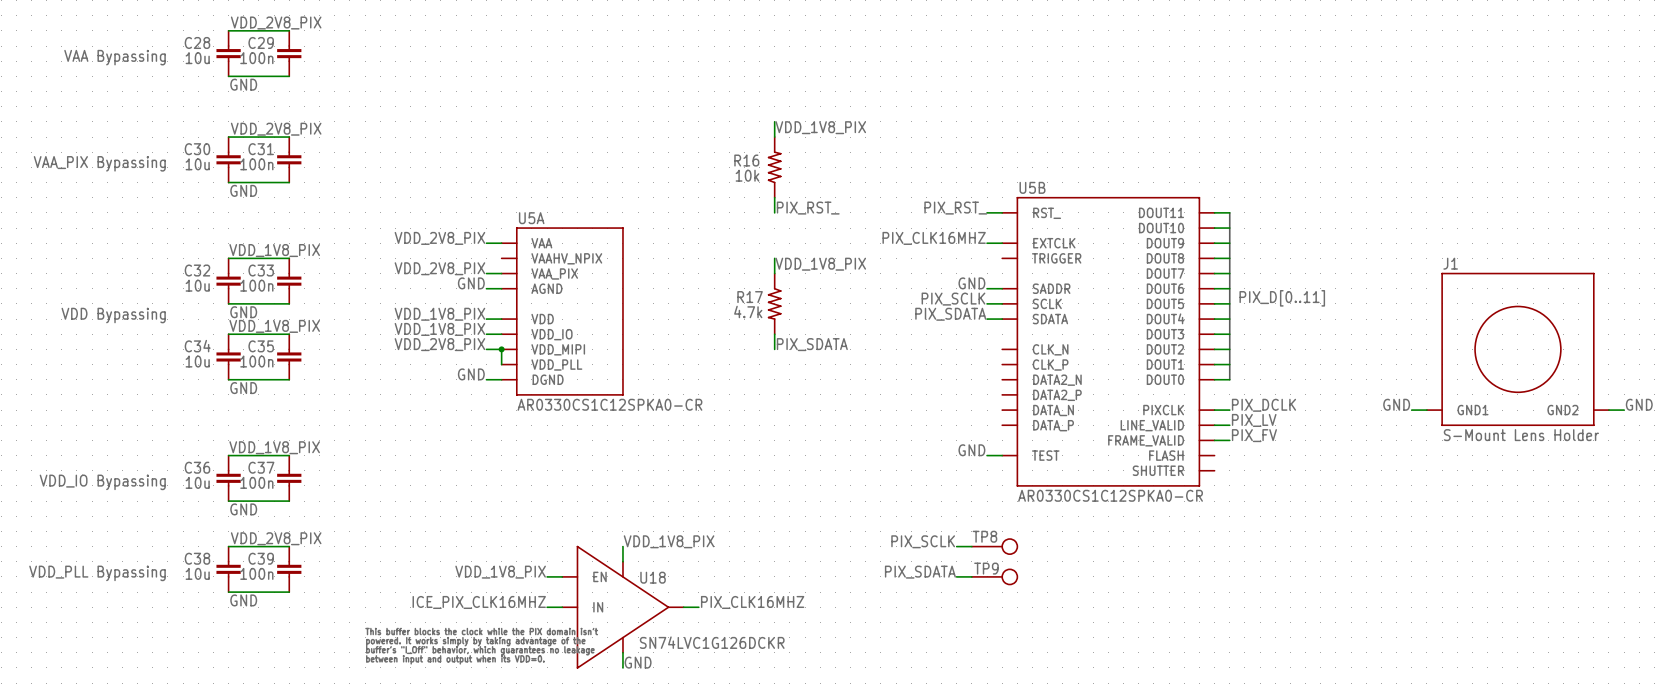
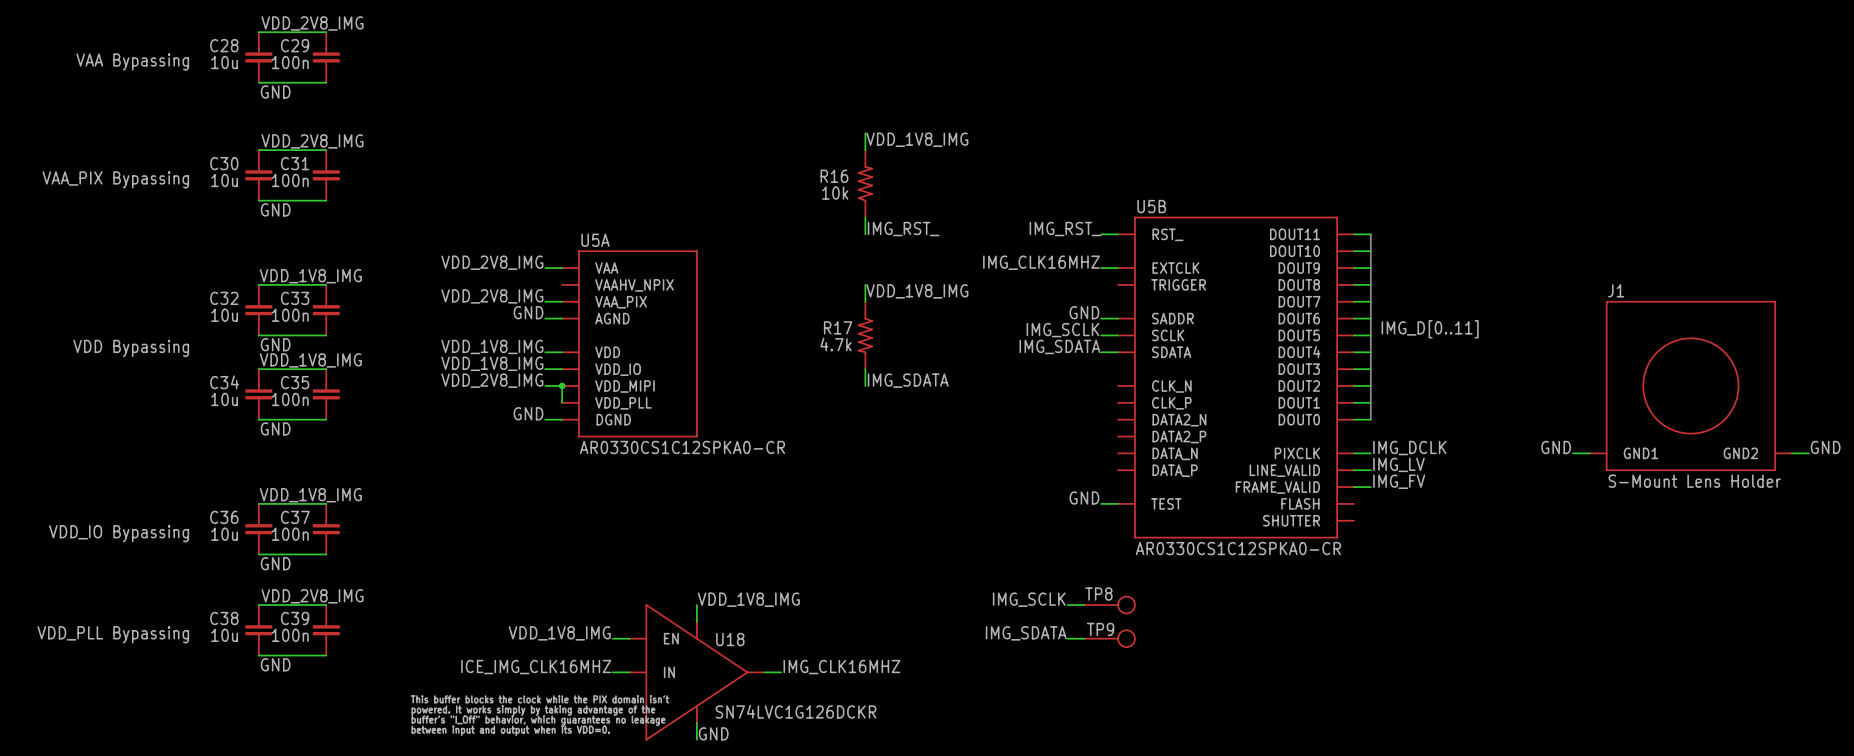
label: VDD_2V8_PIX (276, 23) -> VDD_2V8_IMG (312, 23)
label: VDD_1V8_PIX (820, 127) -> VDD_1V8_IMG (917, 139)
label: VDD_2V8_PIX (276, 129) -> VDD_2V8_IMG (312, 141)
label: PIX_RST_ (808, 208) -> IMG_RST_ (903, 229)
label: PIX_RST_ (955, 208) -> IMG_RST_ (1065, 229)
label: VDD_2V8_PIX (439, 238) -> VDD_2V8_IMG (492, 262)
label: PIX_CLK16MHZ (934, 238) -> IMG_CLK16MHZ (1041, 262)
label: VDD_1V8_PIX (274, 250) -> VDD_1V8_IMG (310, 276)
label: VDD_1V8_PIX (820, 264) -> VDD_1V8_IMG (917, 291)
label: VDD_2V8_PIX (439, 268) -> VDD_2V8_IMG (492, 296)
label: PIX_D[0..11] (1282, 298) -> IMG_D[0..11] (1430, 329)
label: PIX_SCLK (953, 299) -> IMG_SCLK (1062, 330)
label: VDD_1V8_PIX (439, 314) -> VDD_1V8_IMG (492, 346)
label: PIX_SDATA (950, 314) -> IMG_SDATA (1059, 346)
label: VDD_1V8_PIX (274, 326) -> VDD_1V8_IMG (310, 360)
label: VDD_1V8_PIX (439, 329) -> VDD_1V8_IMG (492, 363)
label: VDD_2V8_PIX (439, 344) -> VDD_2V8_IMG (492, 380)
label: PIX_SDATA (812, 344) -> IMG_SDATA (908, 380)
label: PIX_DCLK (1263, 405) -> IMG_DCLK (1409, 448)
label: PIX_LV (1254, 420) -> IMG_LV (1398, 464)
label: PIX_FV (1254, 435) -> IMG_FV (1399, 481)
label: VDD_1V8_PIX (274, 447) -> VDD_1V8_IMG (310, 495)
label: VDD_2V8_PIX (276, 538) -> VDD_2V8_IMG (312, 596)
label: VDD_1V8_PIX (669, 541) -> VDD_1V8_IMG (748, 599)
label: PIX_SCLK (923, 541) -> IMG_SCLK (1029, 599)
label: VDD_1V8_PIX (500, 572) -> VDD_1V8_IMG (559, 633)
label: PIX_SDATA (920, 572) -> IMG_SDATA (1026, 633)
label: ICE_PIX_CLK16MHZ (479, 602) -> ICE_IMG_CLK16MHZ (536, 667)
label: PIX_CLK16MHZ (752, 602) -> IMG_CLK16MHZ (841, 667)

